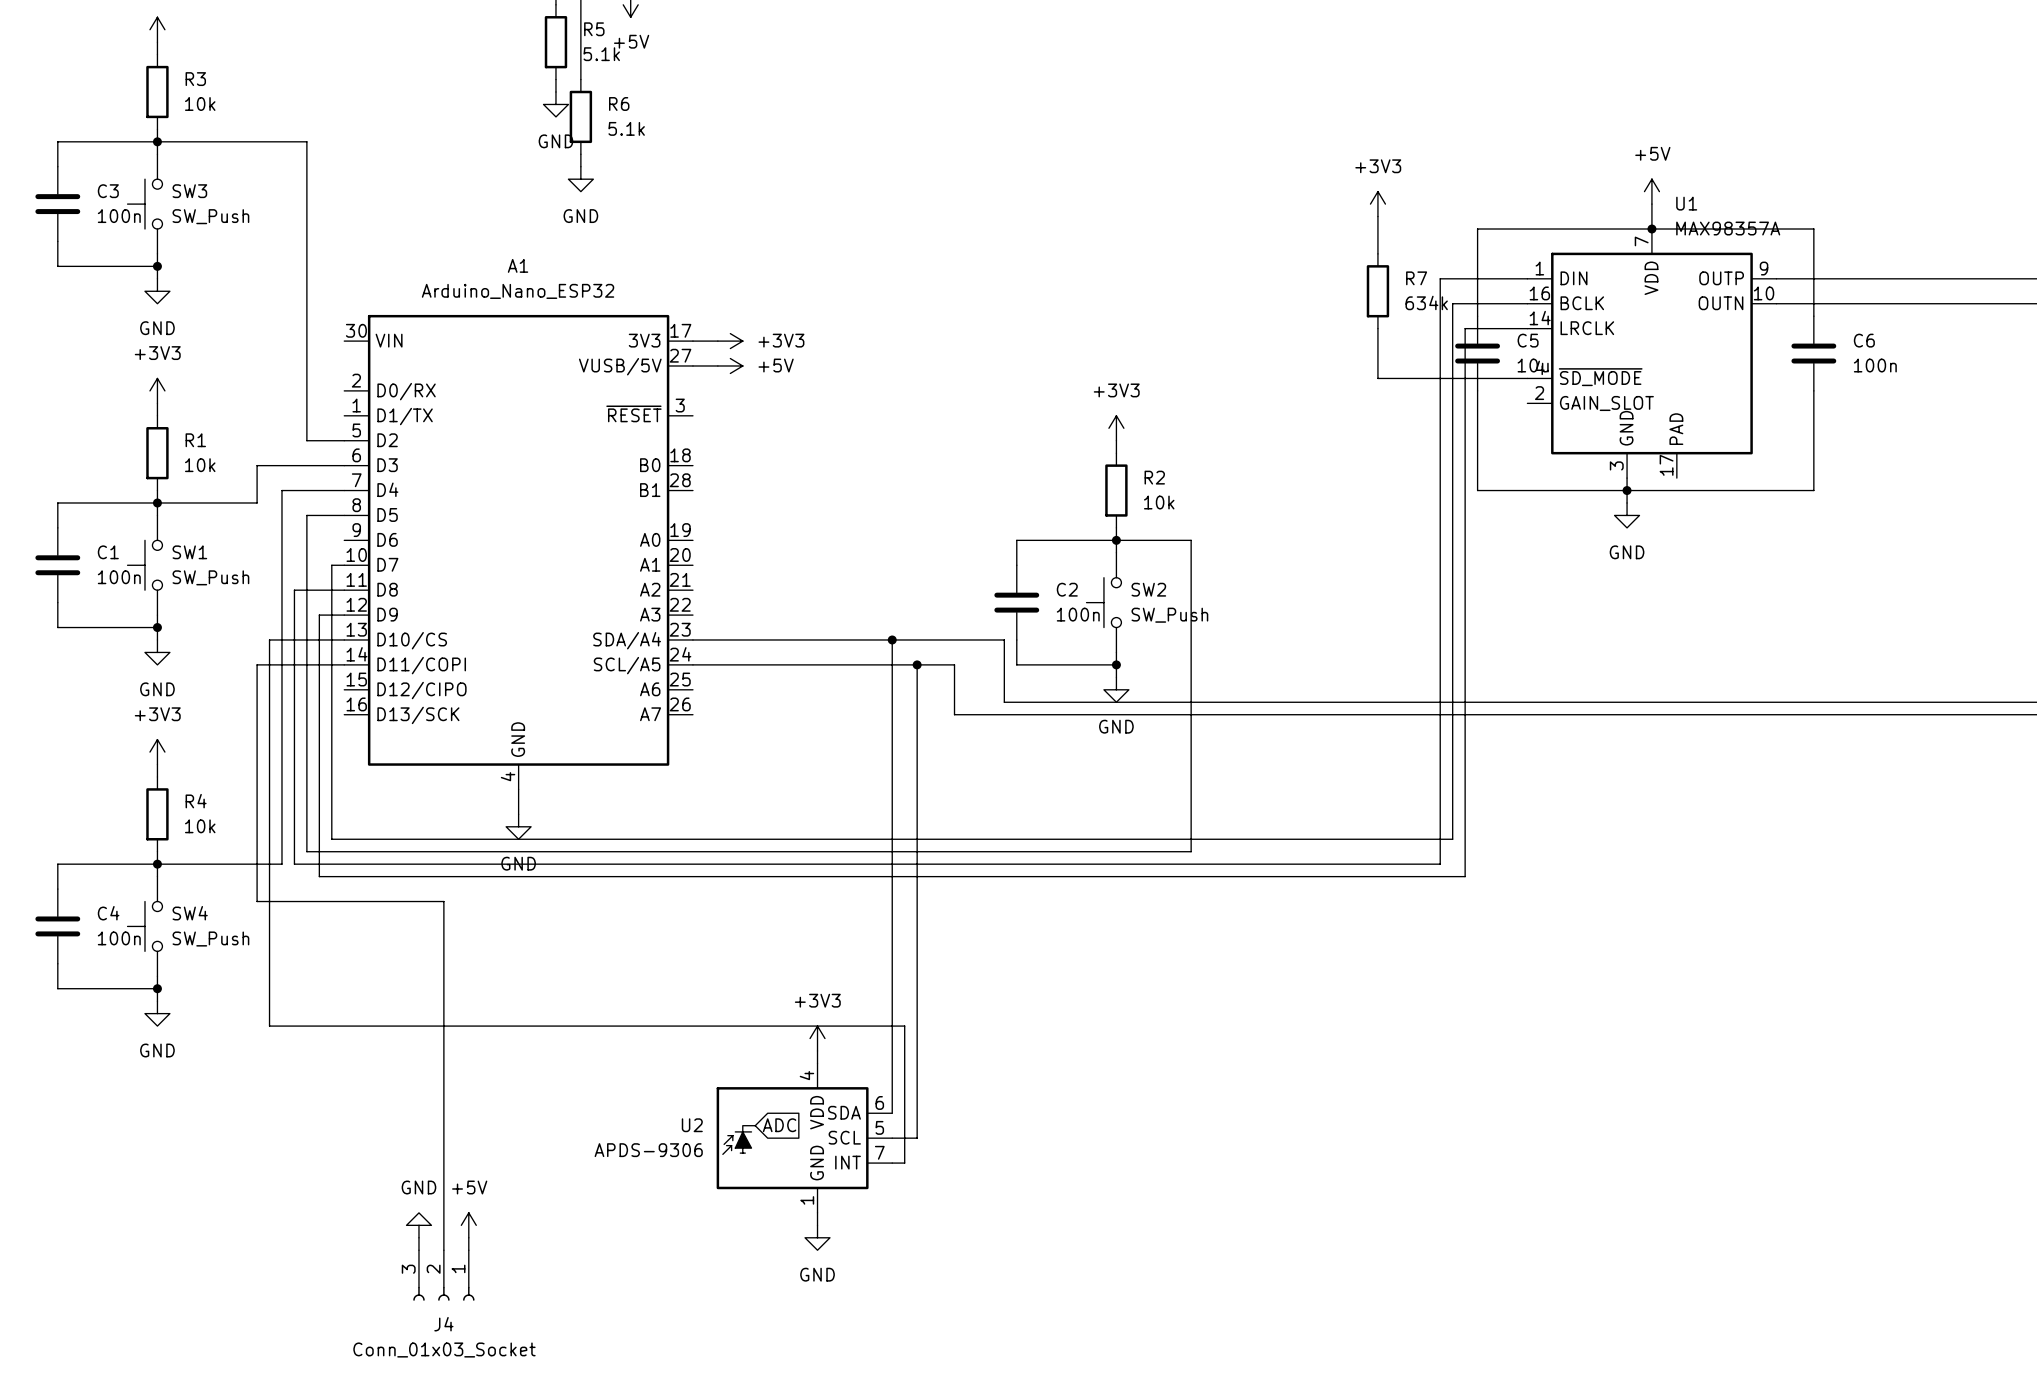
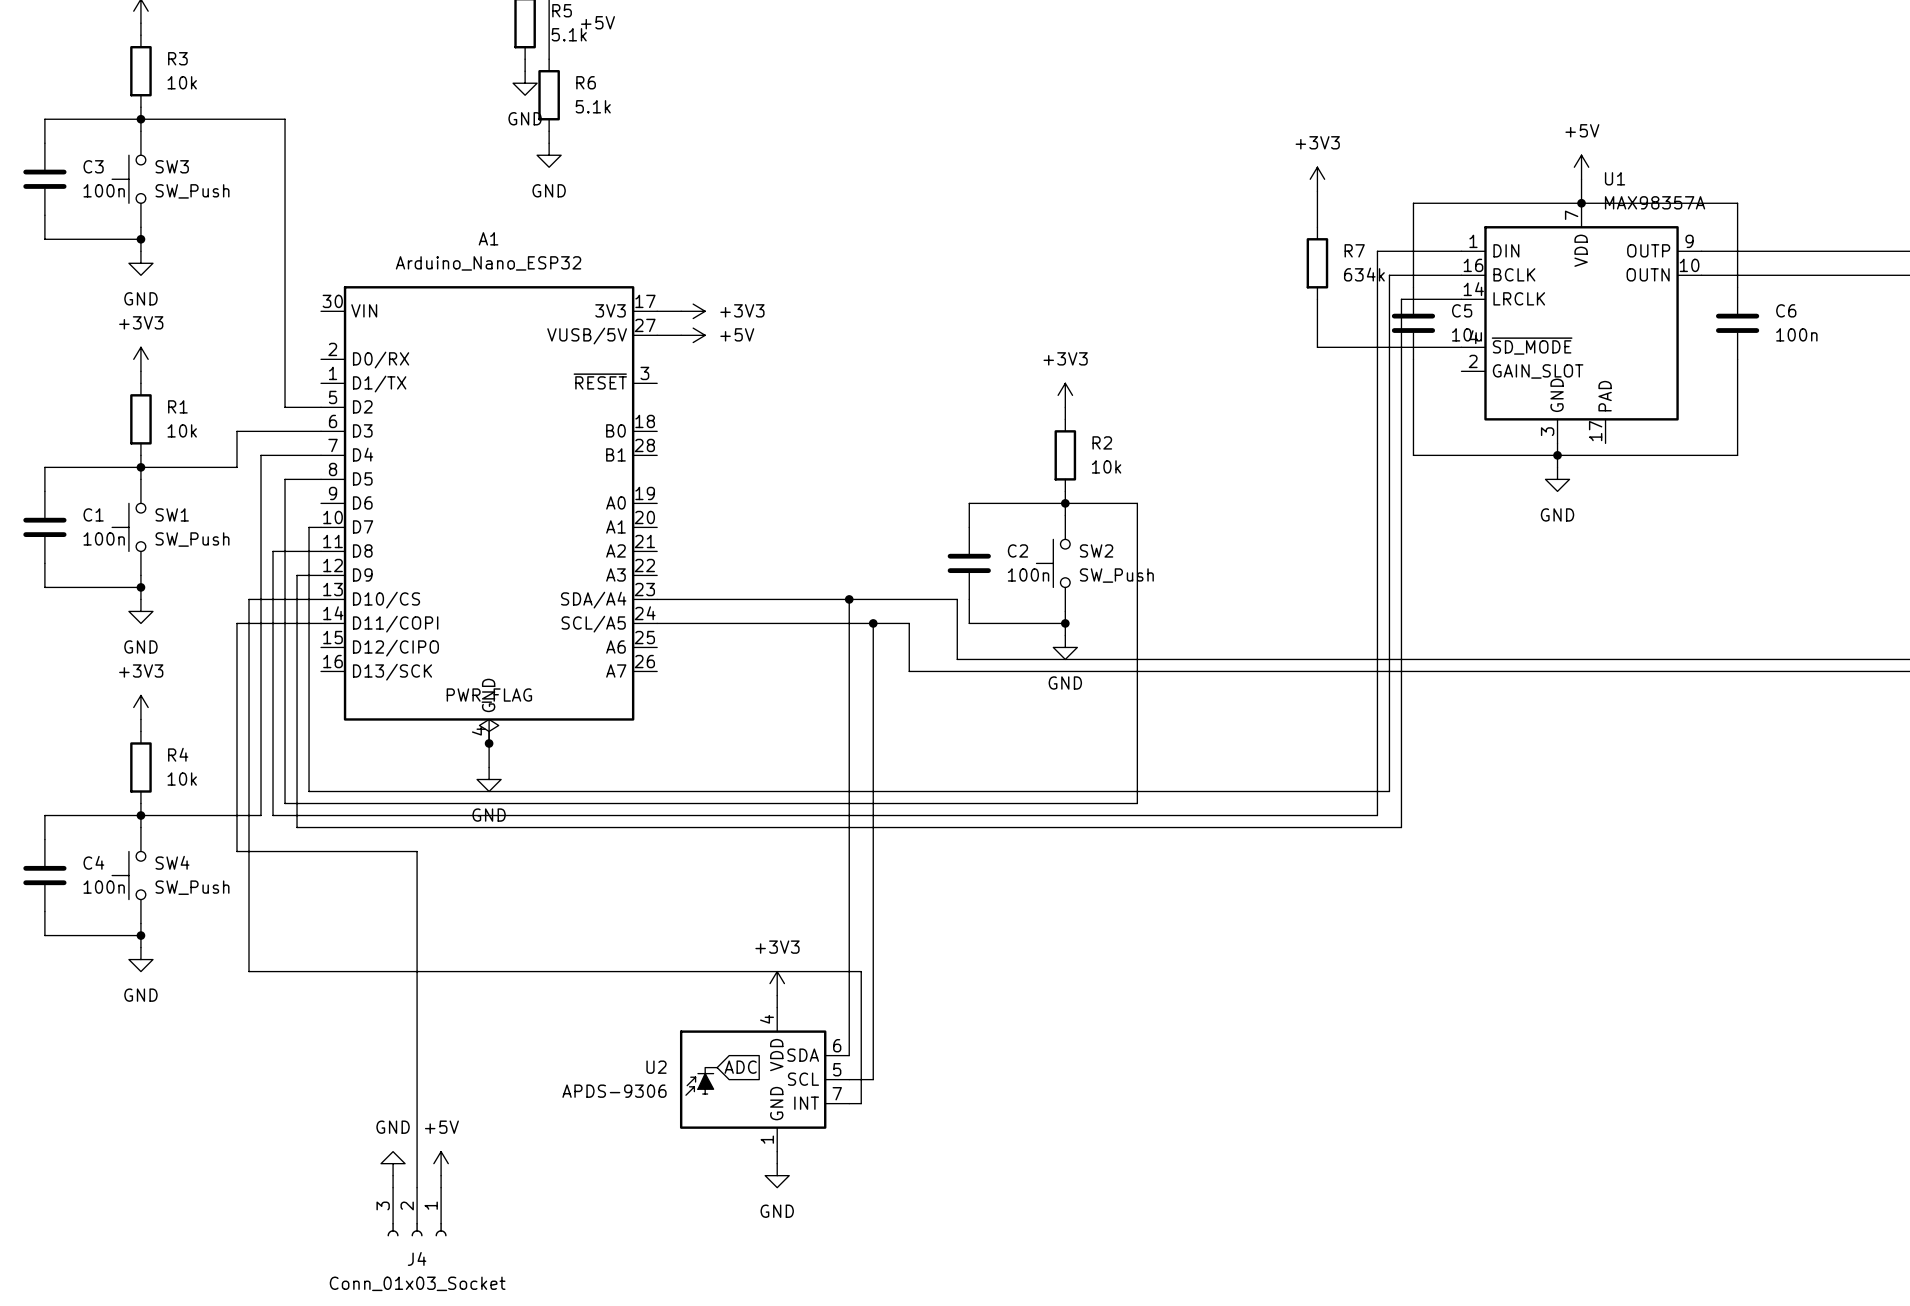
power symbol: none -> PWR_FLAG (489, 731)
junction: none -> (489, 743)

